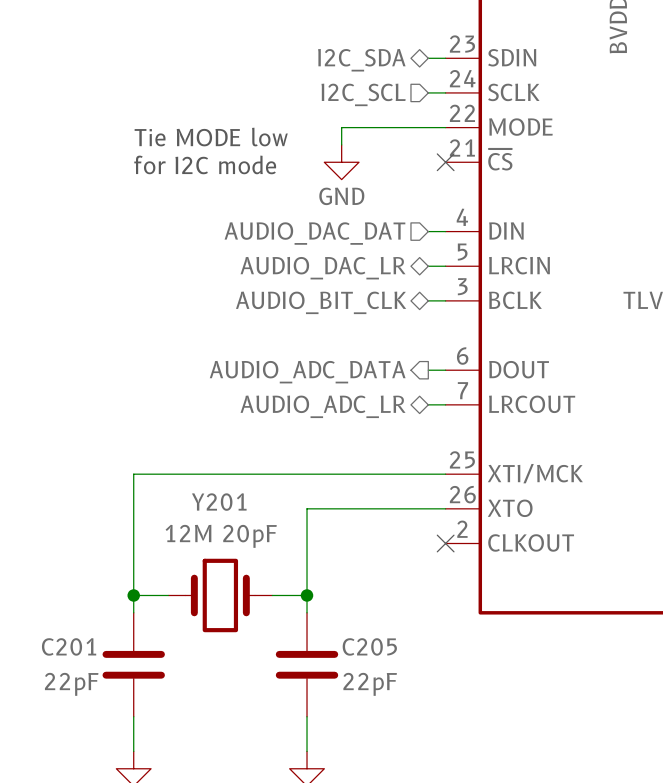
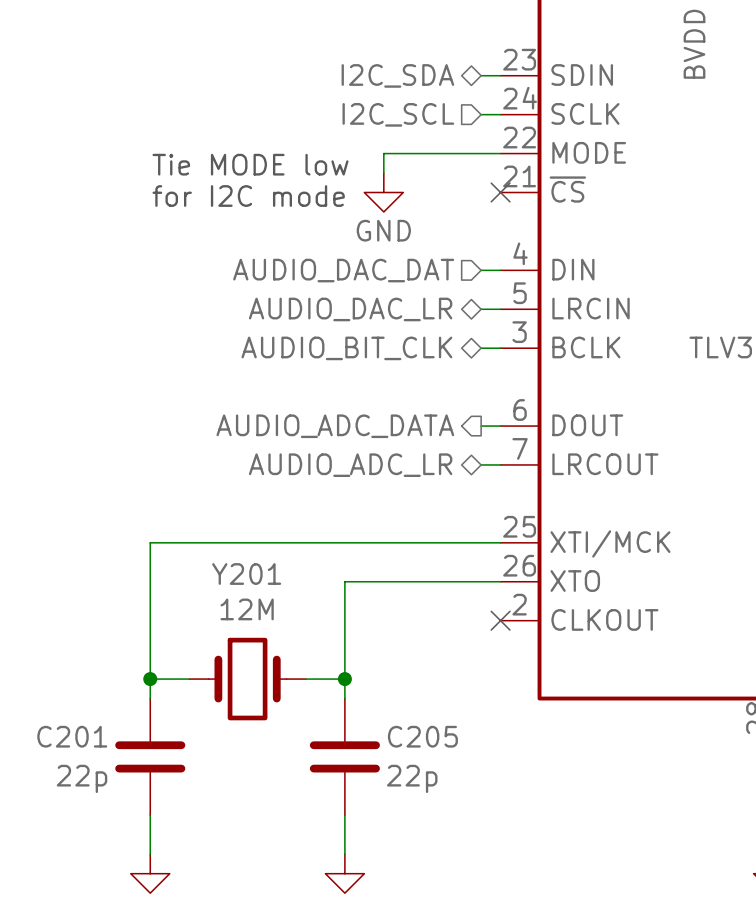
Y201 value: 12M 20pF (221, 536) -> 12M (247, 609)
C201 value: 22pF (71, 684) -> 22p (82, 778)
C205 value: 22pF (370, 684) -> 22p (412, 778)

